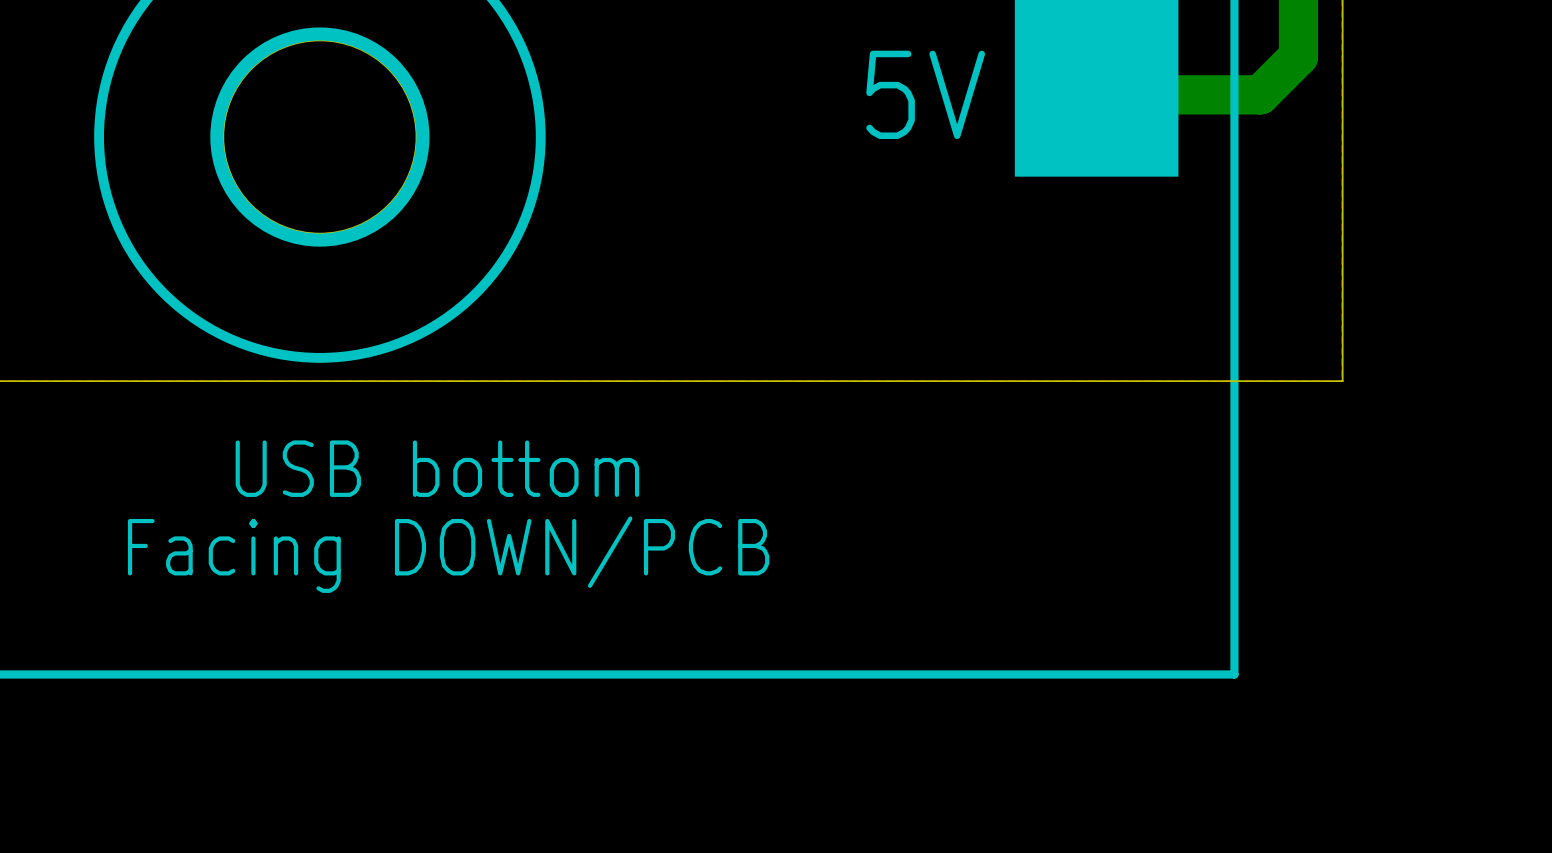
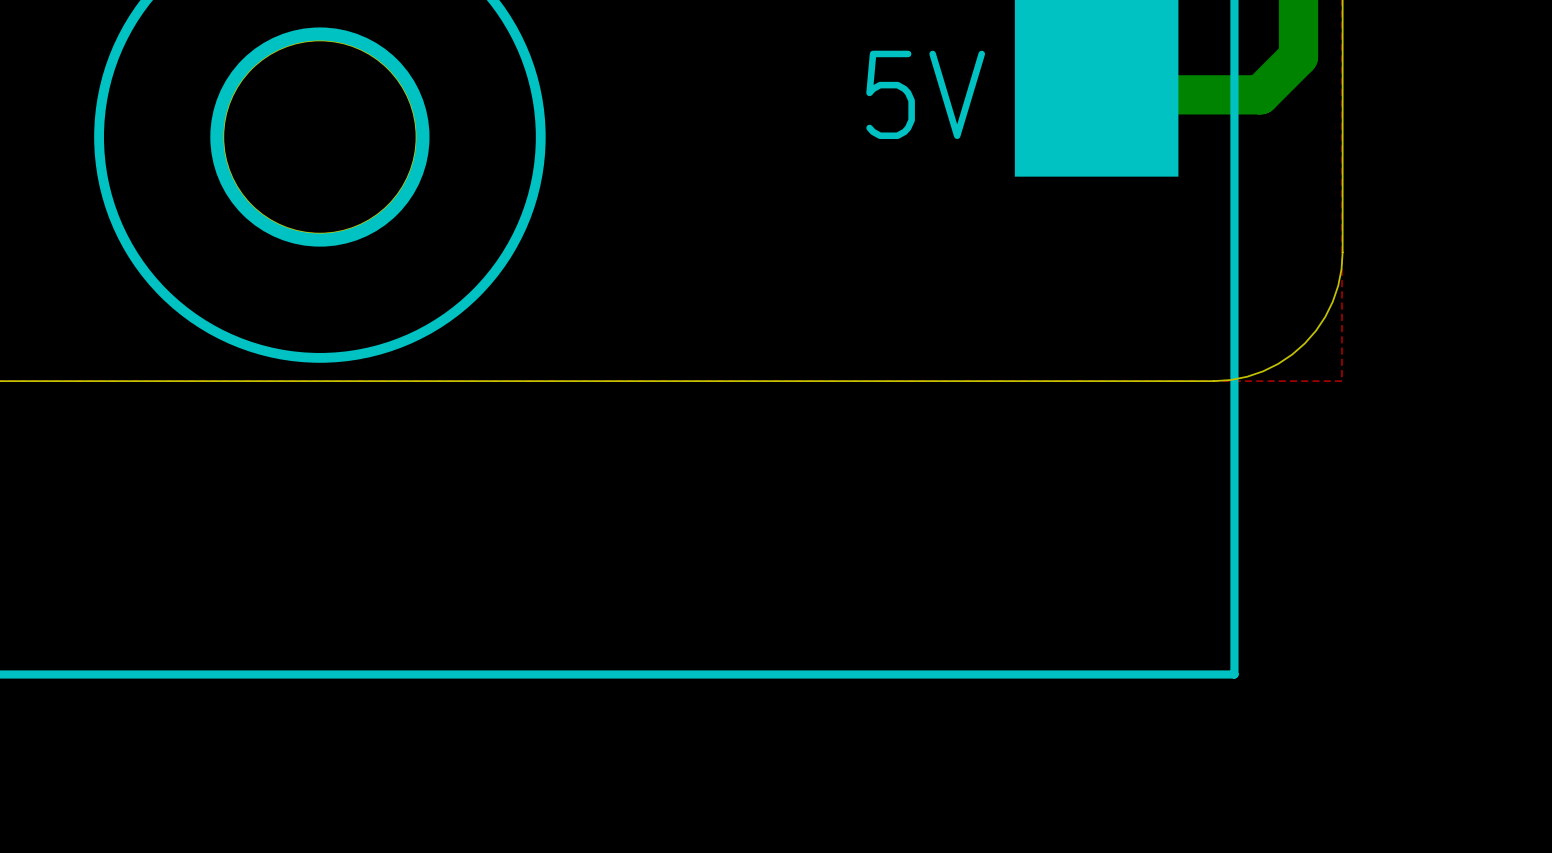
board edge: (1342, 252) (1342, 381) (1213, 381) -> (1342, 252) (1338, 285) (1332, 301) (1325, 316) (1304, 343) (1278, 363) (1263, 371) (1247, 376) (1213, 381)
part text: USB bottom (437, 468) -> none
part text: Facing DOWN/PCB (448, 554) -> none

